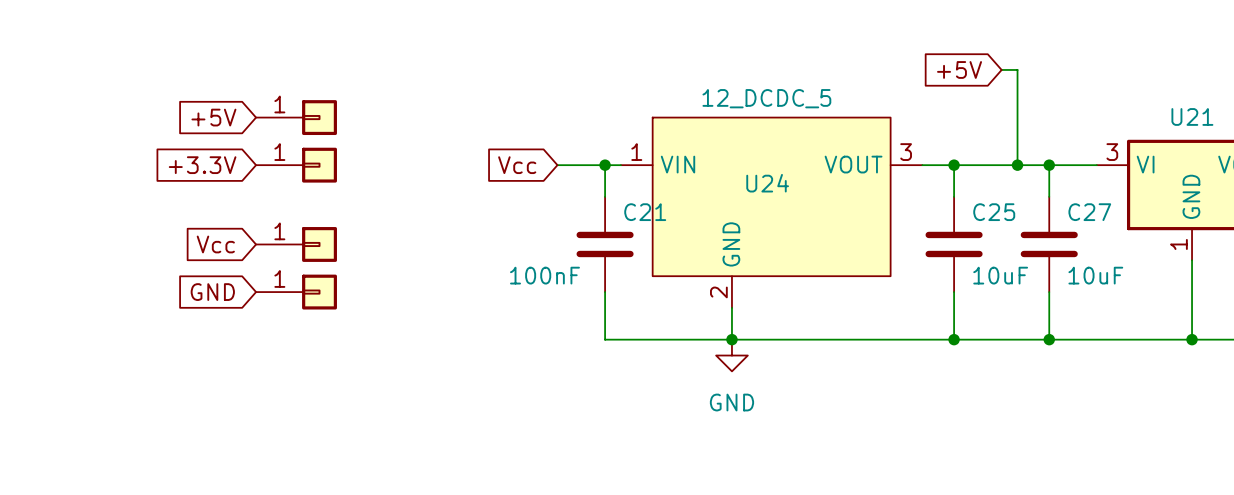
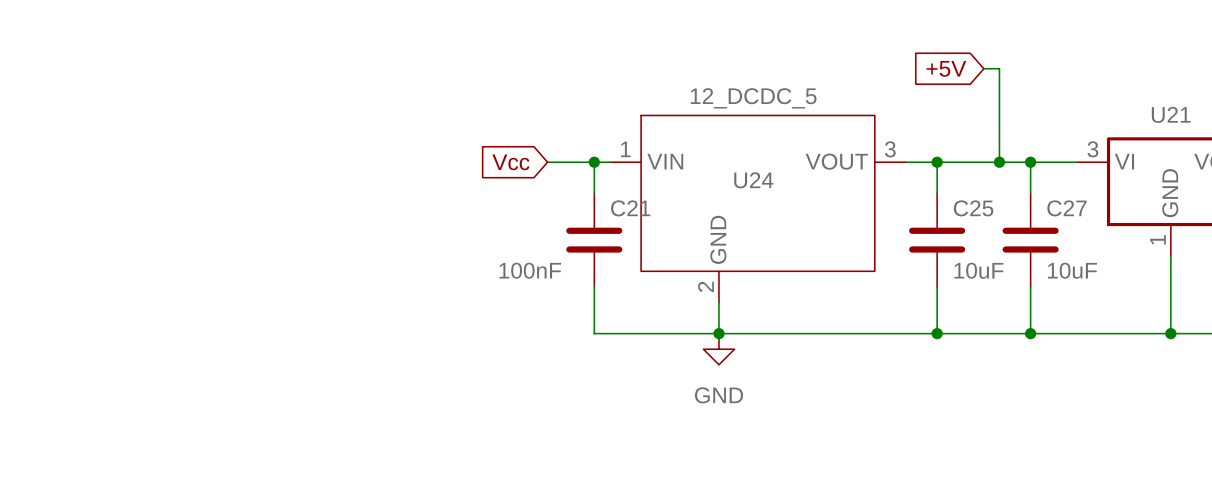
global label: +5V (213, 117) -> none
part: (296, 117) -> none
global label: +3.3V (202, 165) -> none
part: (296, 165) -> none
global label: Vcc (215, 244) -> none
part: (296, 244) -> none
global label: GND (212, 292) -> none
part: (296, 292) -> none

